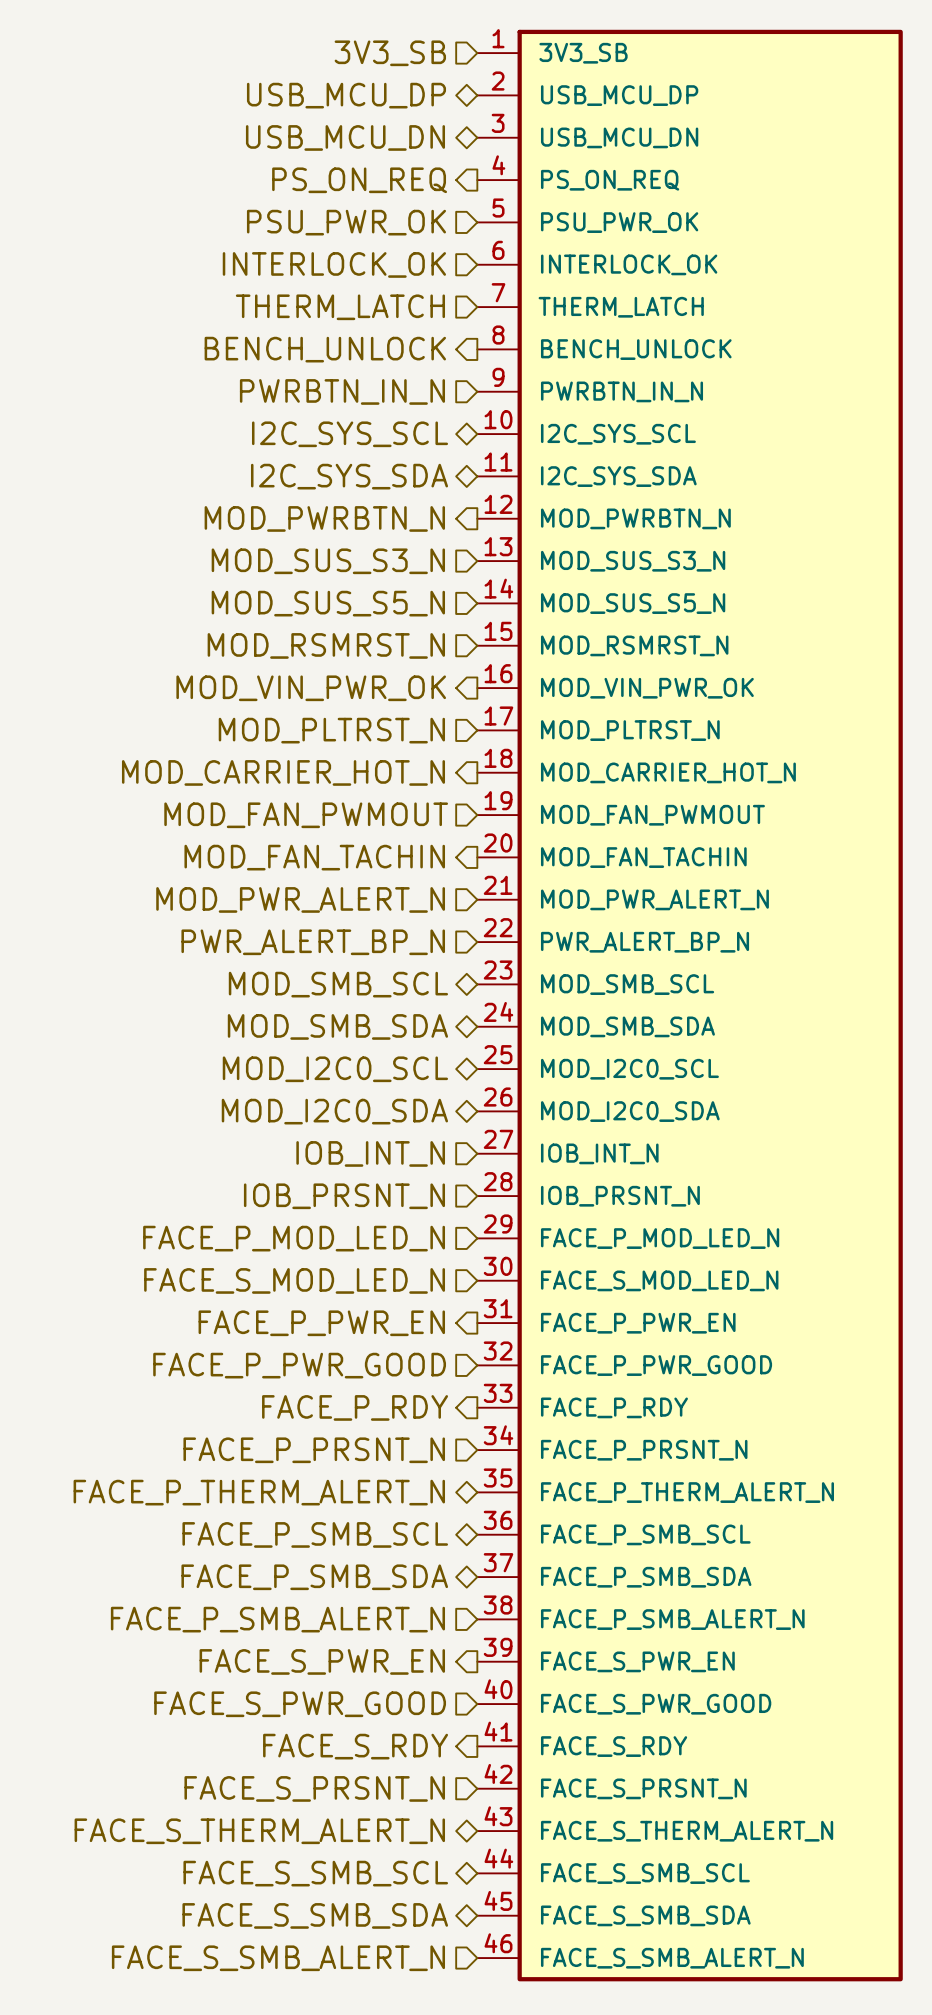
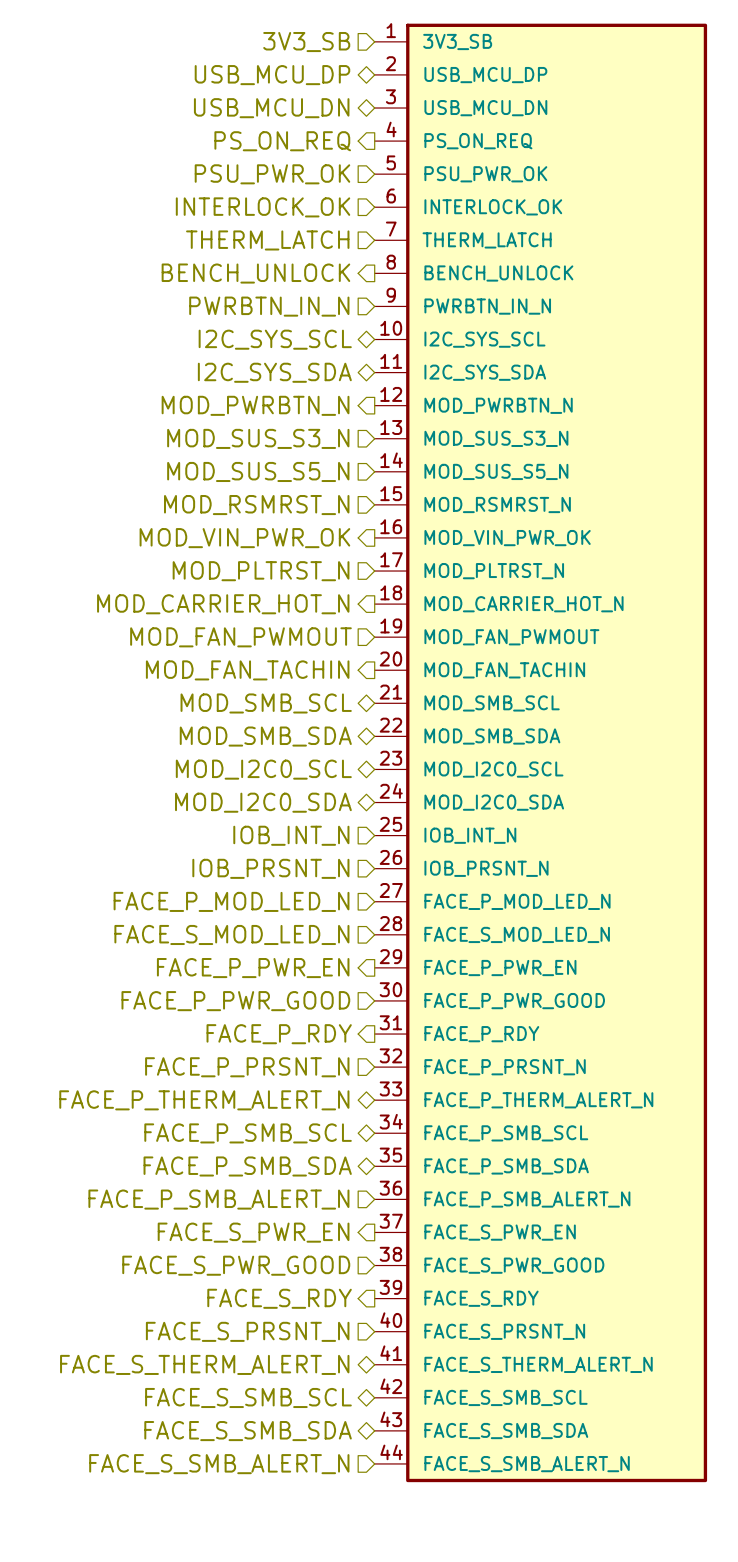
hierarchical label shape: input (300, 899) -> bidirectional (266, 703)
hierarchical label: MOD_PWR_ALERT_N (300, 899) -> MOD_SMB_SCL (266, 703)
hierarchical label shape: input (313, 942) -> bidirectional (265, 736)
hierarchical label: PWR_ALERT_BP_N (313, 942) -> MOD_SMB_SDA (265, 736)
power symbol: none -> (540, 752)
hierarchical label: MOD_SMB_SCL (338, 984) -> MOD_I2C0_SCL (263, 769)
power symbol: (690, 1005) -> none
hierarchical label: MOD_SMB_SDA (337, 1026) -> MOD_I2C0_SDA (263, 802)
hierarchical label shape: bidirectional (335, 1069) -> input (291, 835)
hierarchical label: MOD_I2C0_SCL (335, 1069) -> IOB_INT_N (291, 835)
hierarchical label shape: bidirectional (334, 1111) -> input (270, 868)
hierarchical label: MOD_I2C0_SDA (334, 1111) -> IOB_PRSNT_N (270, 868)
hierarchical label: IOB_INT_N (370, 1153) -> FACE_P_MOD_LED_N (231, 901)
hierarchical label: IOB_PRSNT_N (344, 1196) -> FACE_S_MOD_LED_N (231, 934)
hierarchical label shape: input (294, 1238) -> output (253, 968)
hierarchical label: FACE_P_MOD_LED_N (294, 1238) -> FACE_P_PWR_EN (253, 968)
hierarchical label: FACE_S_MOD_LED_N (294, 1280) -> FACE_P_PWR_GOOD (235, 1001)
hierarchical label: FACE_P_PWR_EN (321, 1323) -> FACE_P_RDY (279, 1034)
hierarchical label: FACE_P_PWR_GOOD (299, 1365) -> FACE_P_PRSNT_N (247, 1067)
hierarchical label shape: output (355, 1407) -> bidirectional (204, 1100)
hierarchical label: FACE_P_RDY (355, 1407) -> FACE_P_THERM_ALERT_N (204, 1100)
hierarchical label shape: input (314, 1450) -> bidirectional (248, 1133)
hierarchical label: FACE_P_PRSNT_N (314, 1450) -> FACE_P_SMB_SCL (248, 1133)
hierarchical label: FACE_P_THERM_ALERT_N (259, 1492) -> FACE_P_SMB_SDA (247, 1166)
hierarchical label shape: bidirectional (315, 1534) -> input (218, 1199)
hierarchical label: FACE_P_SMB_SCL (315, 1534) -> FACE_P_SMB_ALERT_N (218, 1199)
hierarchical label shape: bidirectional (314, 1577) -> output (253, 1232)
hierarchical label: FACE_P_SMB_SDA (314, 1577) -> FACE_S_PWR_EN (253, 1232)
hierarchical label: FACE_P_SMB_ALERT_N (277, 1619) -> FACE_S_PWR_GOOD (236, 1265)
hierarchical label: FACE_S_PWR_EN (322, 1661) -> FACE_S_RDY (279, 1298)
hierarchical label: FACE_S_PWR_GOOD (300, 1704) -> FACE_S_PRSNT_N (247, 1331)
hierarchical label shape: output (355, 1746) -> bidirectional (204, 1364)
hierarchical label: FACE_S_RDY (355, 1746) -> FACE_S_THERM_ALERT_N (204, 1364)
hierarchical label shape: input (314, 1788) -> bidirectional (248, 1397)
hierarchical label: FACE_S_PRSNT_N (314, 1788) -> FACE_S_SMB_SCL (248, 1397)
hierarchical label: FACE_S_THERM_ALERT_N (259, 1831) -> FACE_S_SMB_SDA (248, 1431)
hierarchical label shape: bidirectional (315, 1873) -> input (219, 1464)
hierarchical label: FACE_S_SMB_SCL (315, 1873) -> FACE_S_SMB_ALERT_N (219, 1464)
hierarchical label: FACE_S_SMB_SDA (315, 1915) -> none
hierarchical label: FACE_S_SMB_ALERT_N (278, 1958) -> none

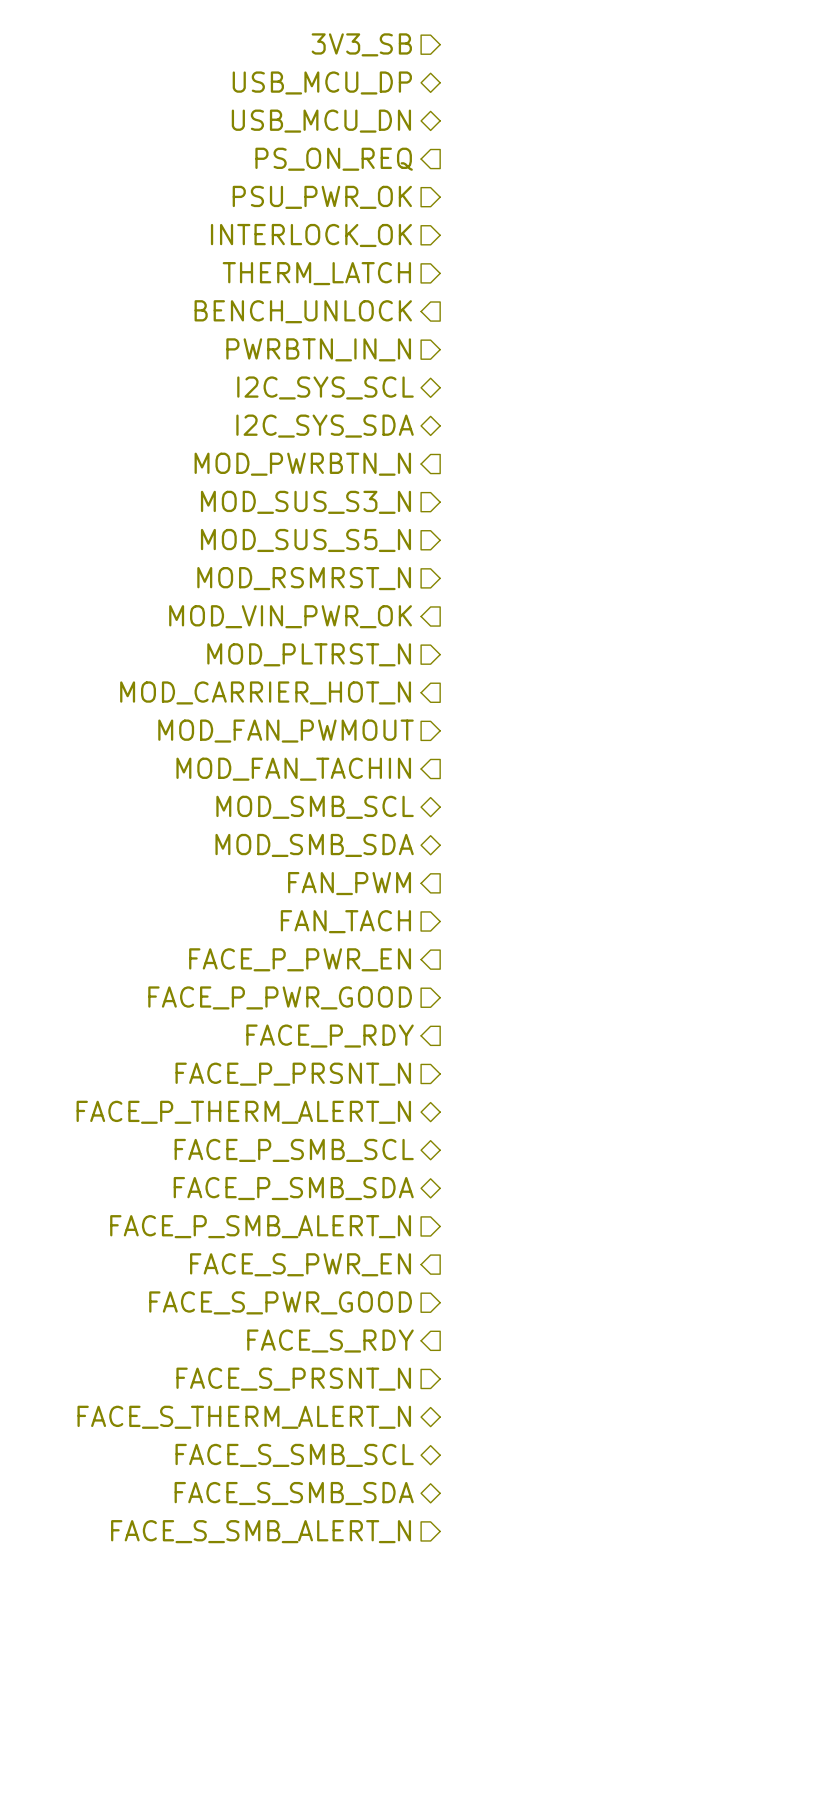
power symbol: (540, 752) -> none
hierarchical label shape: bidirectional (263, 769) -> output (349, 883)
hierarchical label: MOD_I2C0_SCL (263, 769) -> FAN_PWM (349, 883)
hierarchical label shape: bidirectional (263, 802) -> input (345, 921)
hierarchical label: MOD_I2C0_SDA (263, 802) -> FAN_TACH (345, 921)
hierarchical label shape: input (291, 835) -> output (300, 959)
hierarchical label: IOB_INT_N (291, 835) -> FACE_P_PWR_EN (300, 959)
hierarchical label: IOB_PRSNT_N (270, 868) -> FACE_P_PWR_GOOD (280, 997)
hierarchical label shape: input (231, 901) -> output (330, 1036)
hierarchical label: FACE_P_MOD_LED_N (231, 901) -> FACE_P_RDY (330, 1036)
hierarchical label: FACE_S_MOD_LED_N (231, 934) -> FACE_P_PRSNT_N (293, 1074)
hierarchical label shape: output (253, 968) -> bidirectional (243, 1112)
hierarchical label: FACE_P_PWR_EN (253, 968) -> FACE_P_THERM_ALERT_N (243, 1112)
hierarchical label shape: input (235, 1001) -> bidirectional (294, 1150)
hierarchical label: FACE_P_PWR_GOOD (235, 1001) -> FACE_P_SMB_SCL (294, 1150)
hierarchical label shape: output (279, 1034) -> bidirectional (293, 1188)
hierarchical label: FACE_P_RDY (279, 1034) -> FACE_P_SMB_SDA (293, 1188)
hierarchical label: FACE_P_PRSNT_N (247, 1067) -> FACE_P_SMB_ALERT_N (260, 1226)
hierarchical label shape: bidirectional (204, 1100) -> output (300, 1264)
hierarchical label: FACE_P_THERM_ALERT_N (204, 1100) -> FACE_S_PWR_EN (300, 1264)
hierarchical label shape: bidirectional (248, 1133) -> input (280, 1302)
hierarchical label: FACE_P_SMB_SCL (248, 1133) -> FACE_S_PWR_GOOD (280, 1302)
hierarchical label shape: bidirectional (247, 1166) -> output (330, 1341)
hierarchical label: FACE_P_SMB_SDA (247, 1166) -> FACE_S_RDY (330, 1341)
hierarchical label: FACE_P_SMB_ALERT_N (218, 1199) -> FACE_S_PRSNT_N (293, 1379)
hierarchical label shape: output (253, 1232) -> bidirectional (244, 1417)
hierarchical label: FACE_S_PWR_EN (253, 1232) -> FACE_S_THERM_ALERT_N (244, 1417)
hierarchical label shape: input (236, 1265) -> bidirectional (294, 1455)
hierarchical label: FACE_S_PWR_GOOD (236, 1265) -> FACE_S_SMB_SCL (294, 1455)
hierarchical label shape: output (279, 1298) -> bidirectional (294, 1493)
hierarchical label: FACE_S_RDY (279, 1298) -> FACE_S_SMB_SDA (294, 1493)
hierarchical label: FACE_S_PRSNT_N (247, 1331) -> FACE_S_SMB_ALERT_N (261, 1531)
hierarchical label: FACE_S_THERM_ALERT_N (204, 1364) -> none
hierarchical label: FACE_S_SMB_SCL (248, 1397) -> none
hierarchical label: FACE_S_SMB_SDA (248, 1431) -> none
hierarchical label: FACE_S_SMB_ALERT_N (219, 1464) -> none

